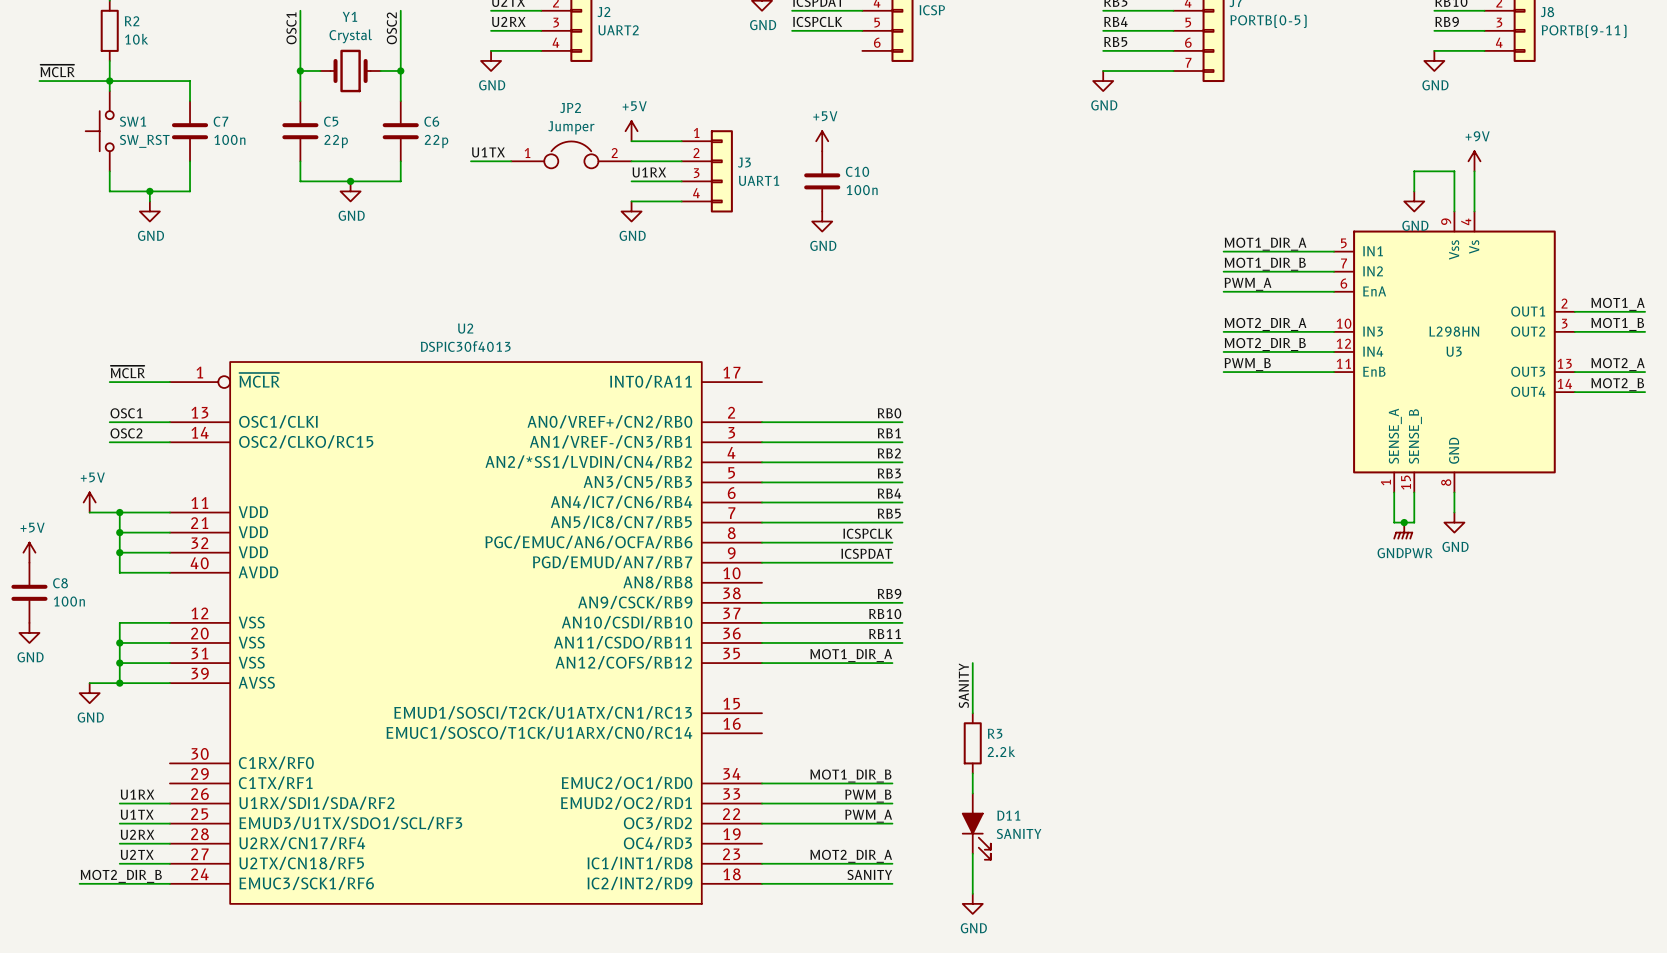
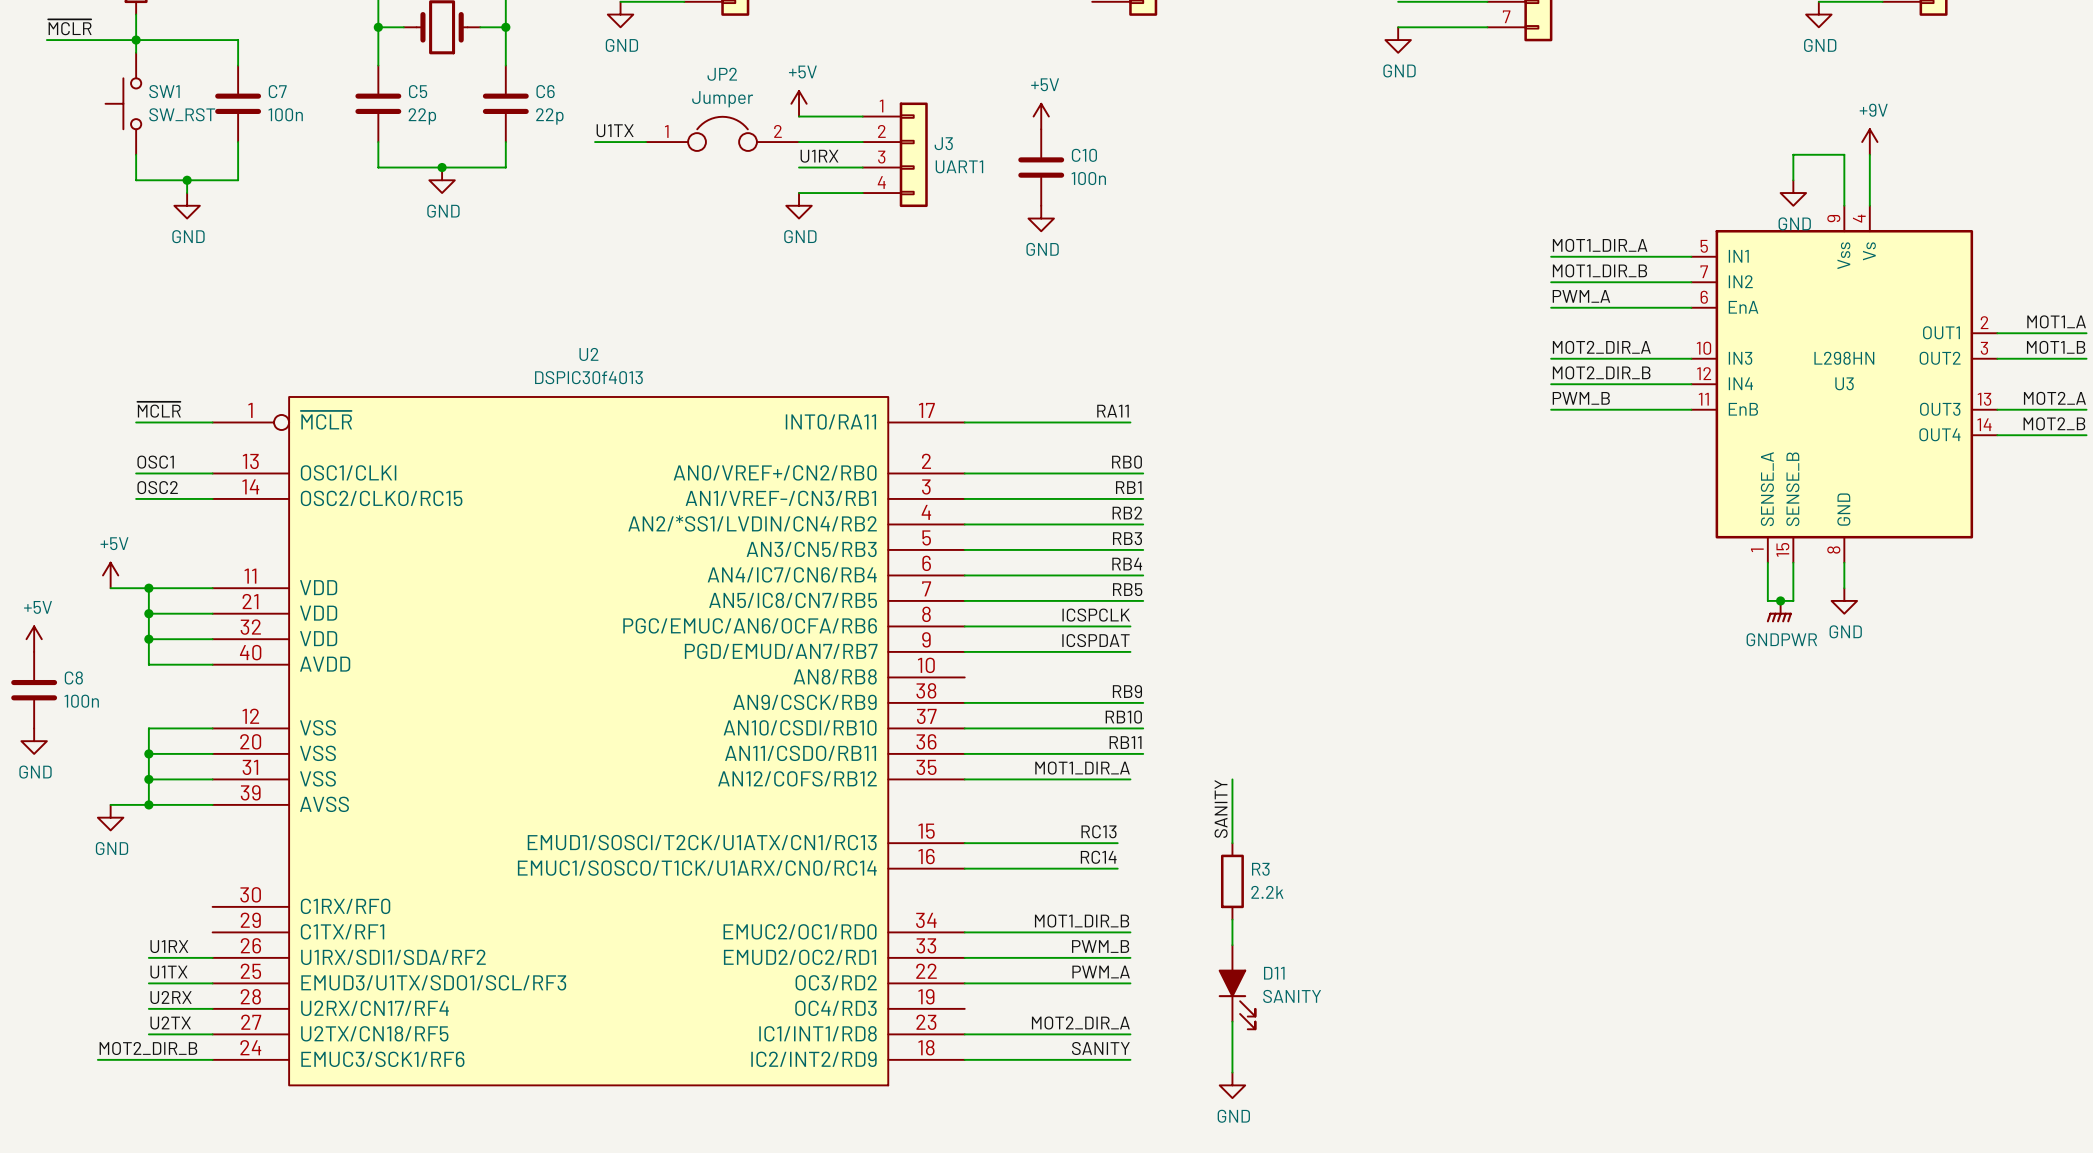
label: none -> RA11 (1112, 411)
wire: none -> (964, 422) (1130, 422)
label: none -> RC13 (1099, 831)
wire: none -> (964, 843) (1117, 843)
label: none -> RC14 (1098, 857)
wire: none -> (964, 868) (1117, 868)

